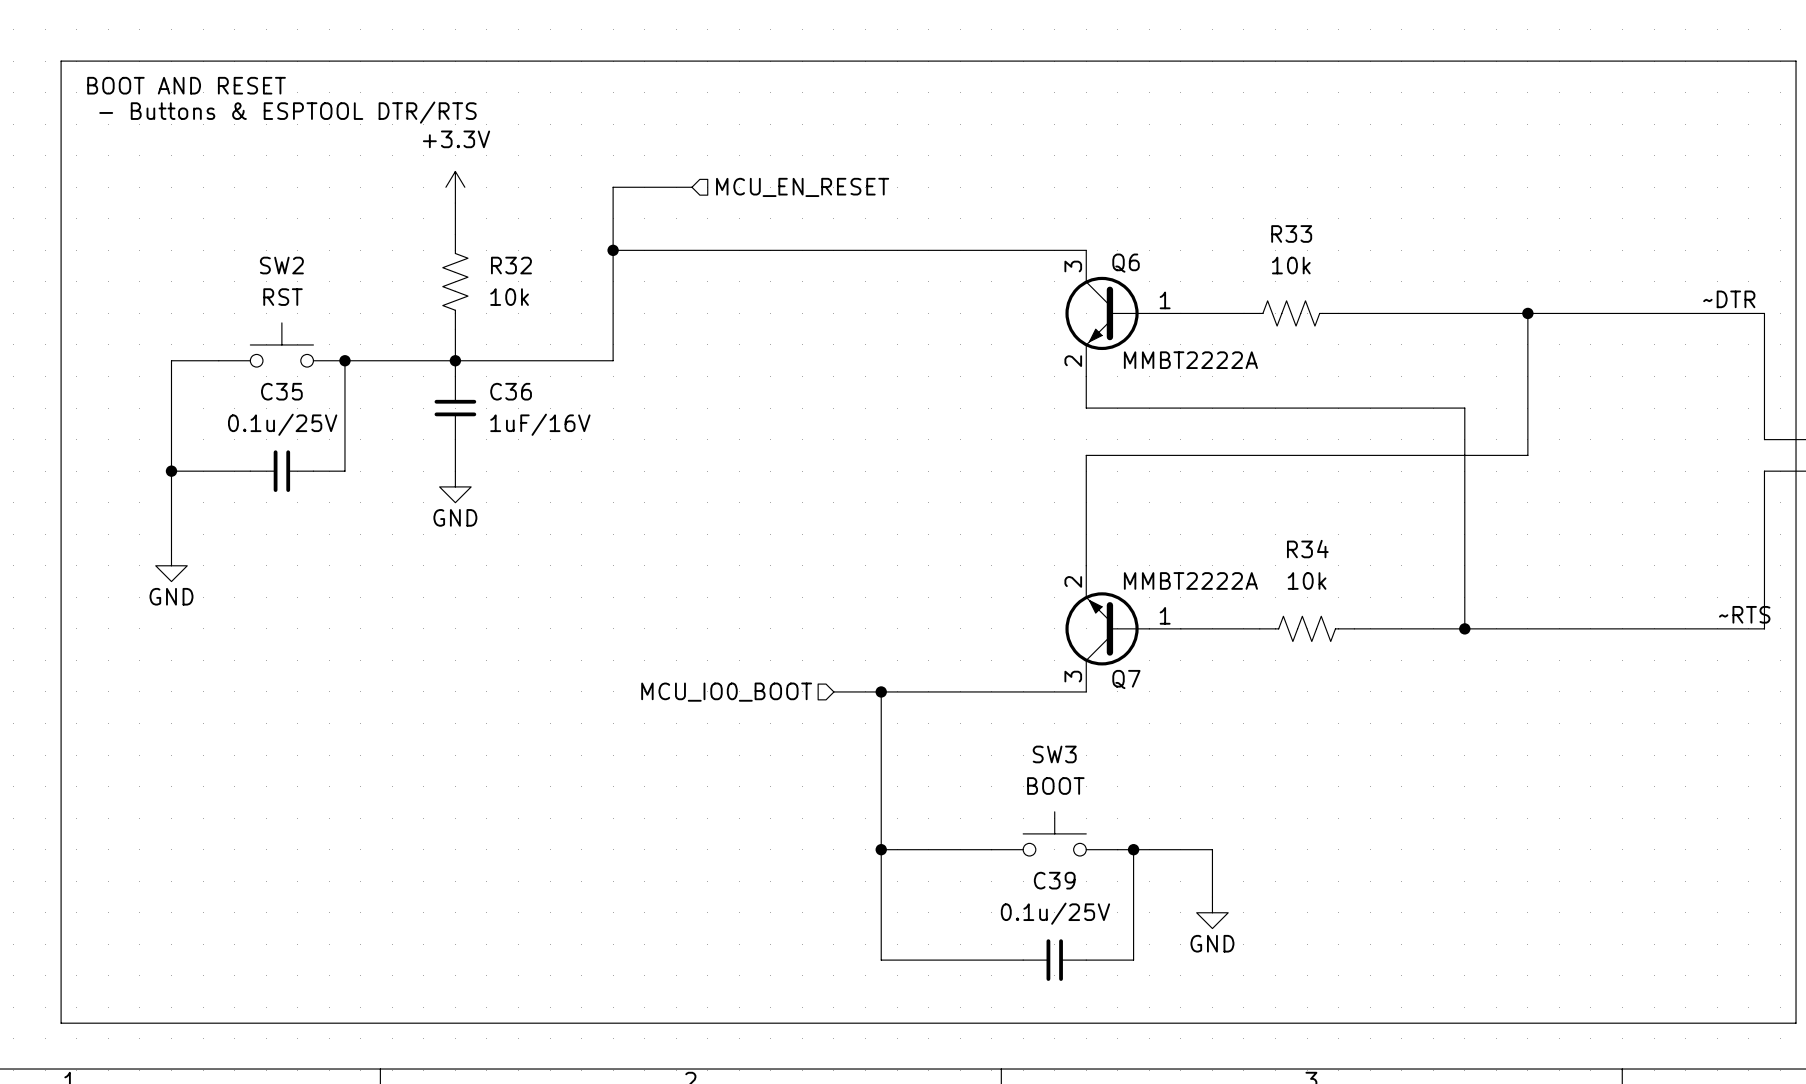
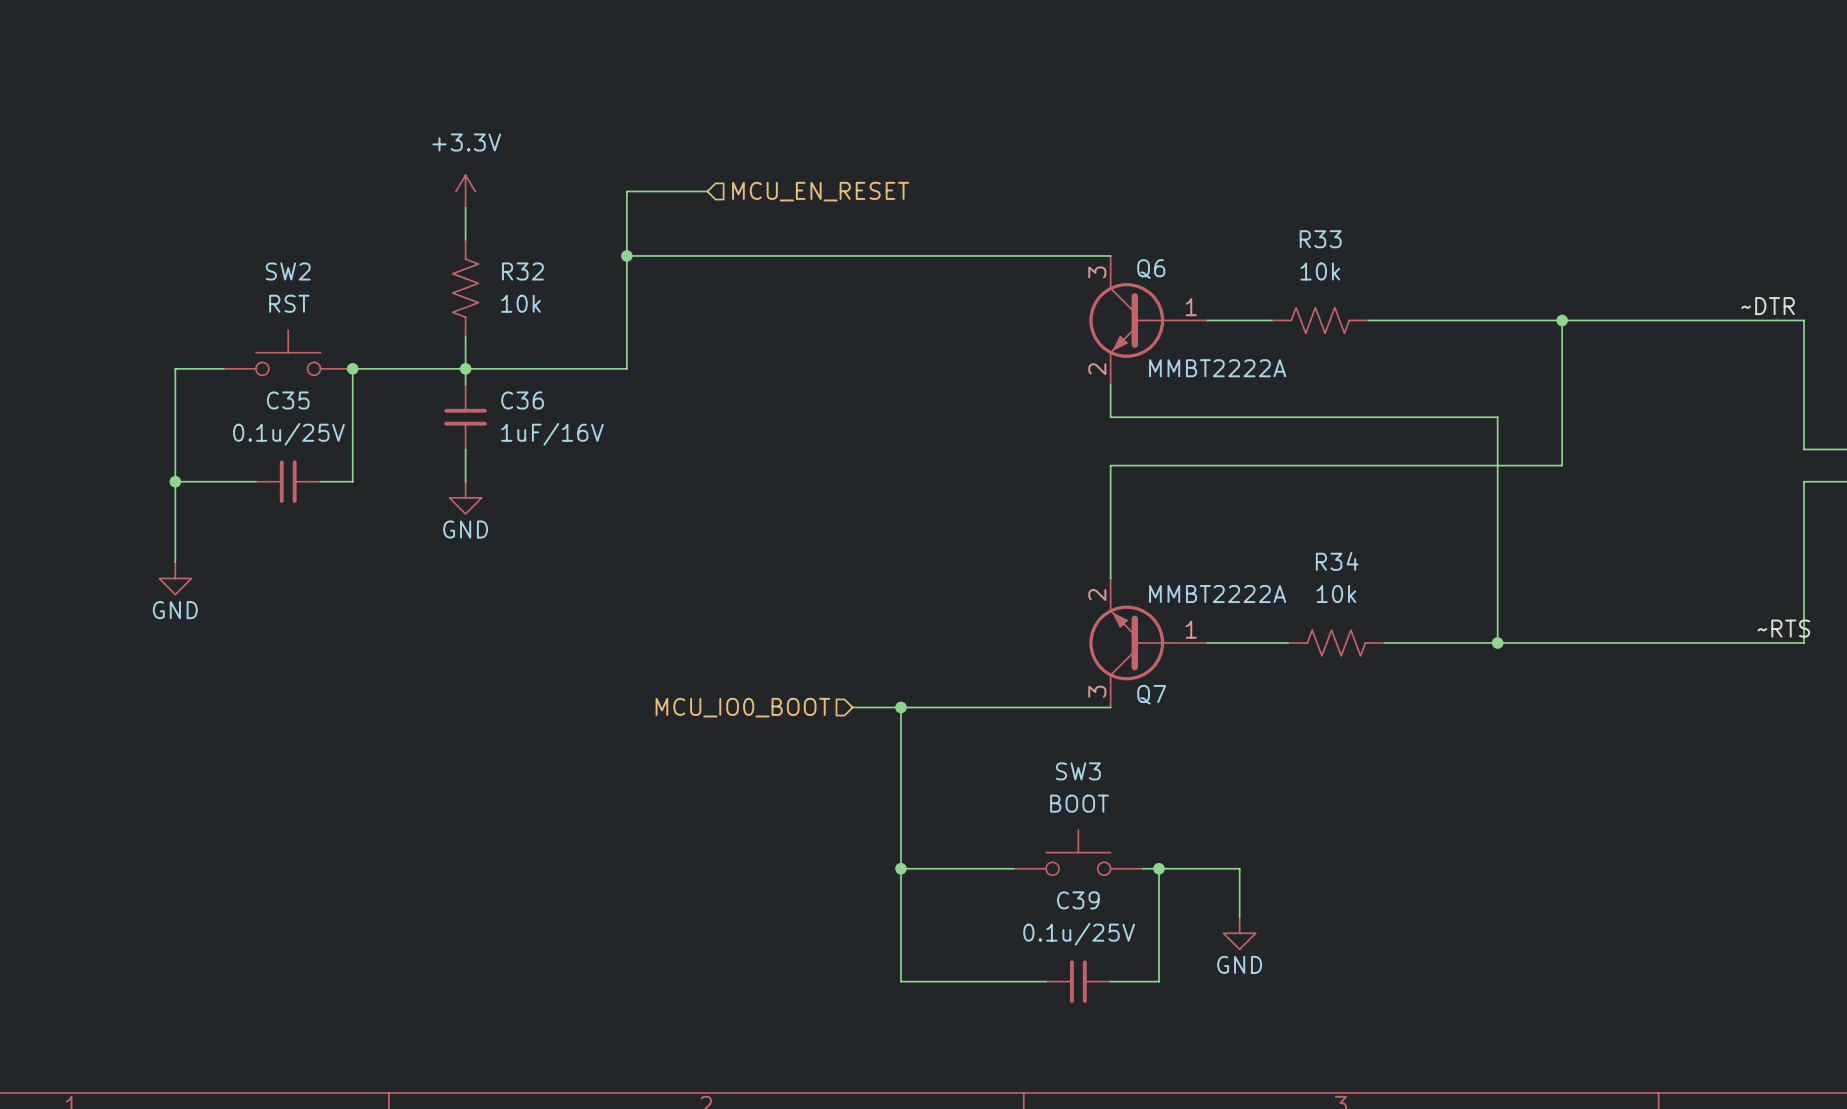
line: (61, 61) (1796, 61) (1796, 1023) (61, 1023) (61, 61) -> none
text: BOOT AND RESET (186, 85) -> none
text: - Buttons & ESPTOOL DTR/RTS (287, 112) -> none

